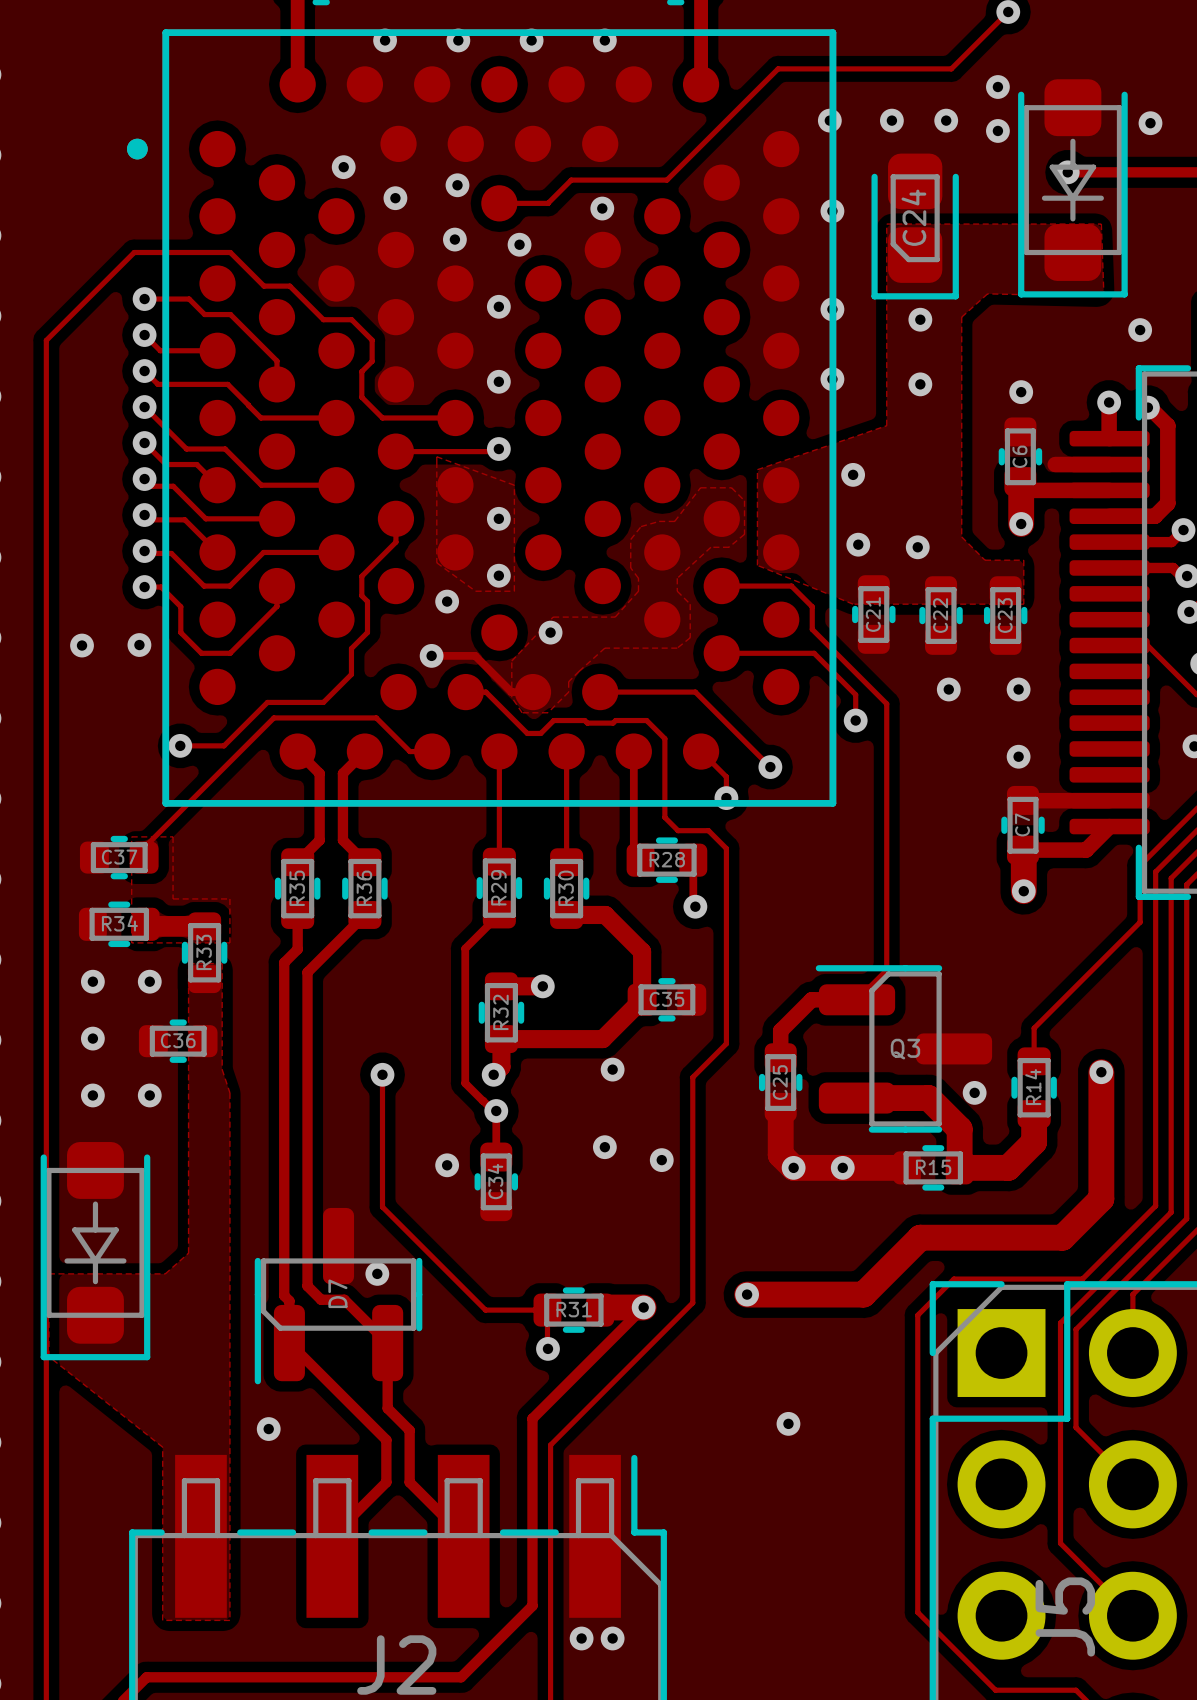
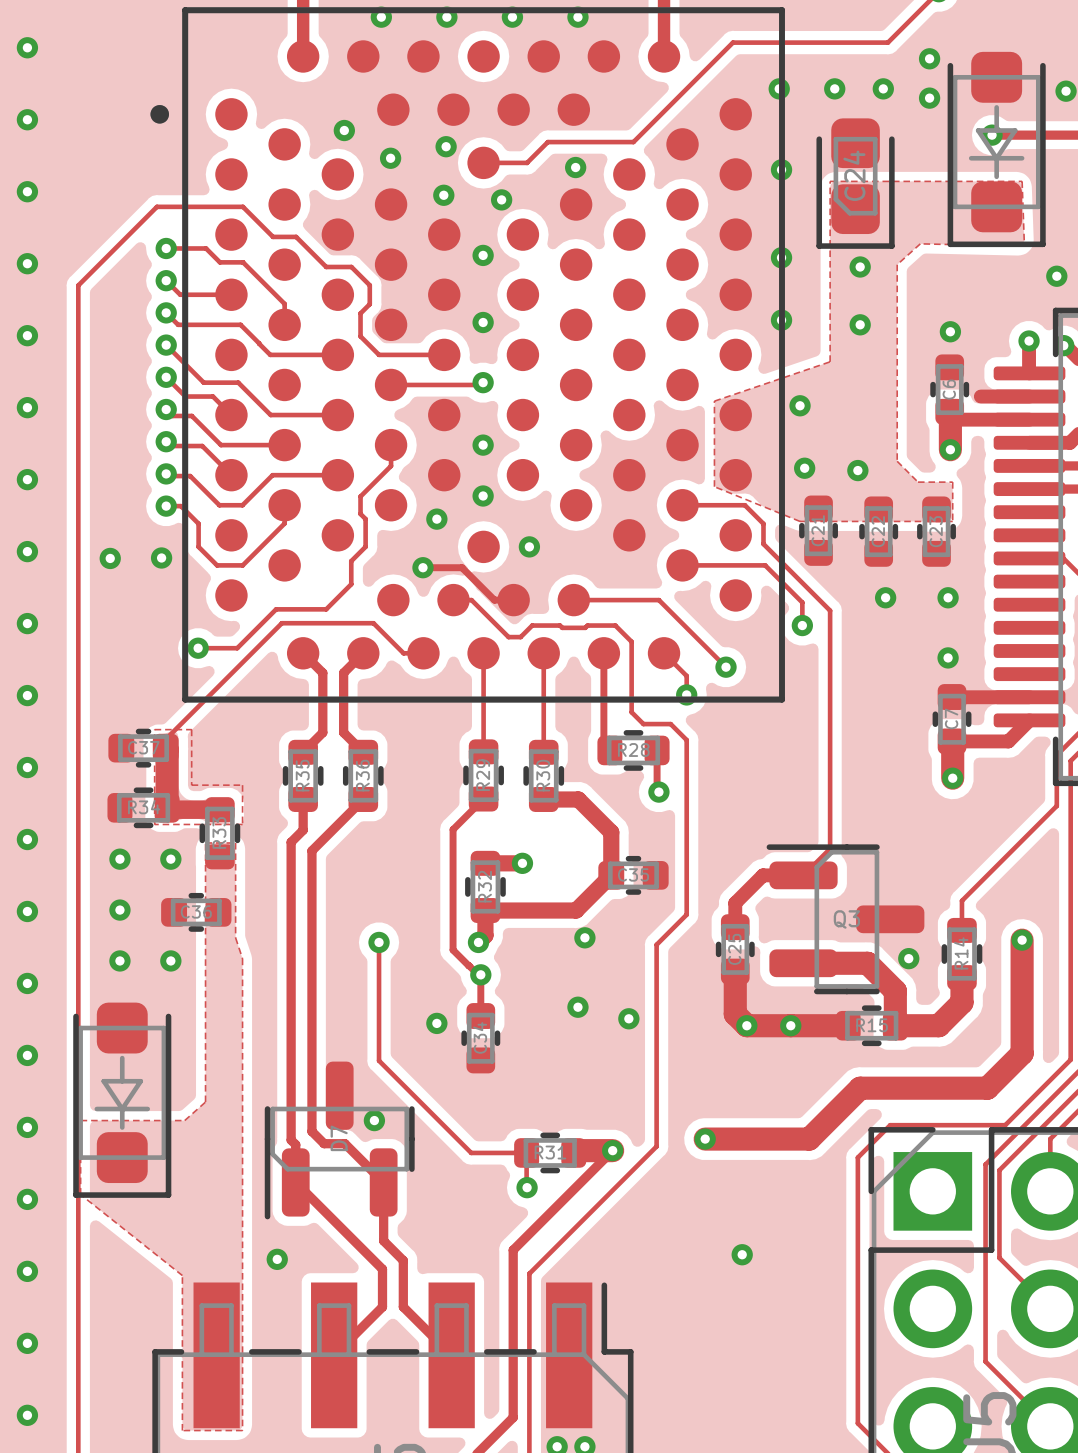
zone outline: (436, 456) (514, 485) (514, 591) (475, 591) (436, 562) (436, 456) -> none
zone outline: (700, 487) (731, 487) (744, 500) (744, 534) (728, 547) (710, 547) (677, 578) (677, 591) (690, 604) (690, 637) (677, 648) (604, 648) (568, 681) (568, 692) (547, 712) (522, 712) (511, 697) (511, 661) (553, 617) (615, 617) (638, 591) (638, 578) (630, 567) (630, 539) (641, 526) (659, 521) (674, 521) (700, 487) -> none
track: none -> (165, 748) (167, 807)

